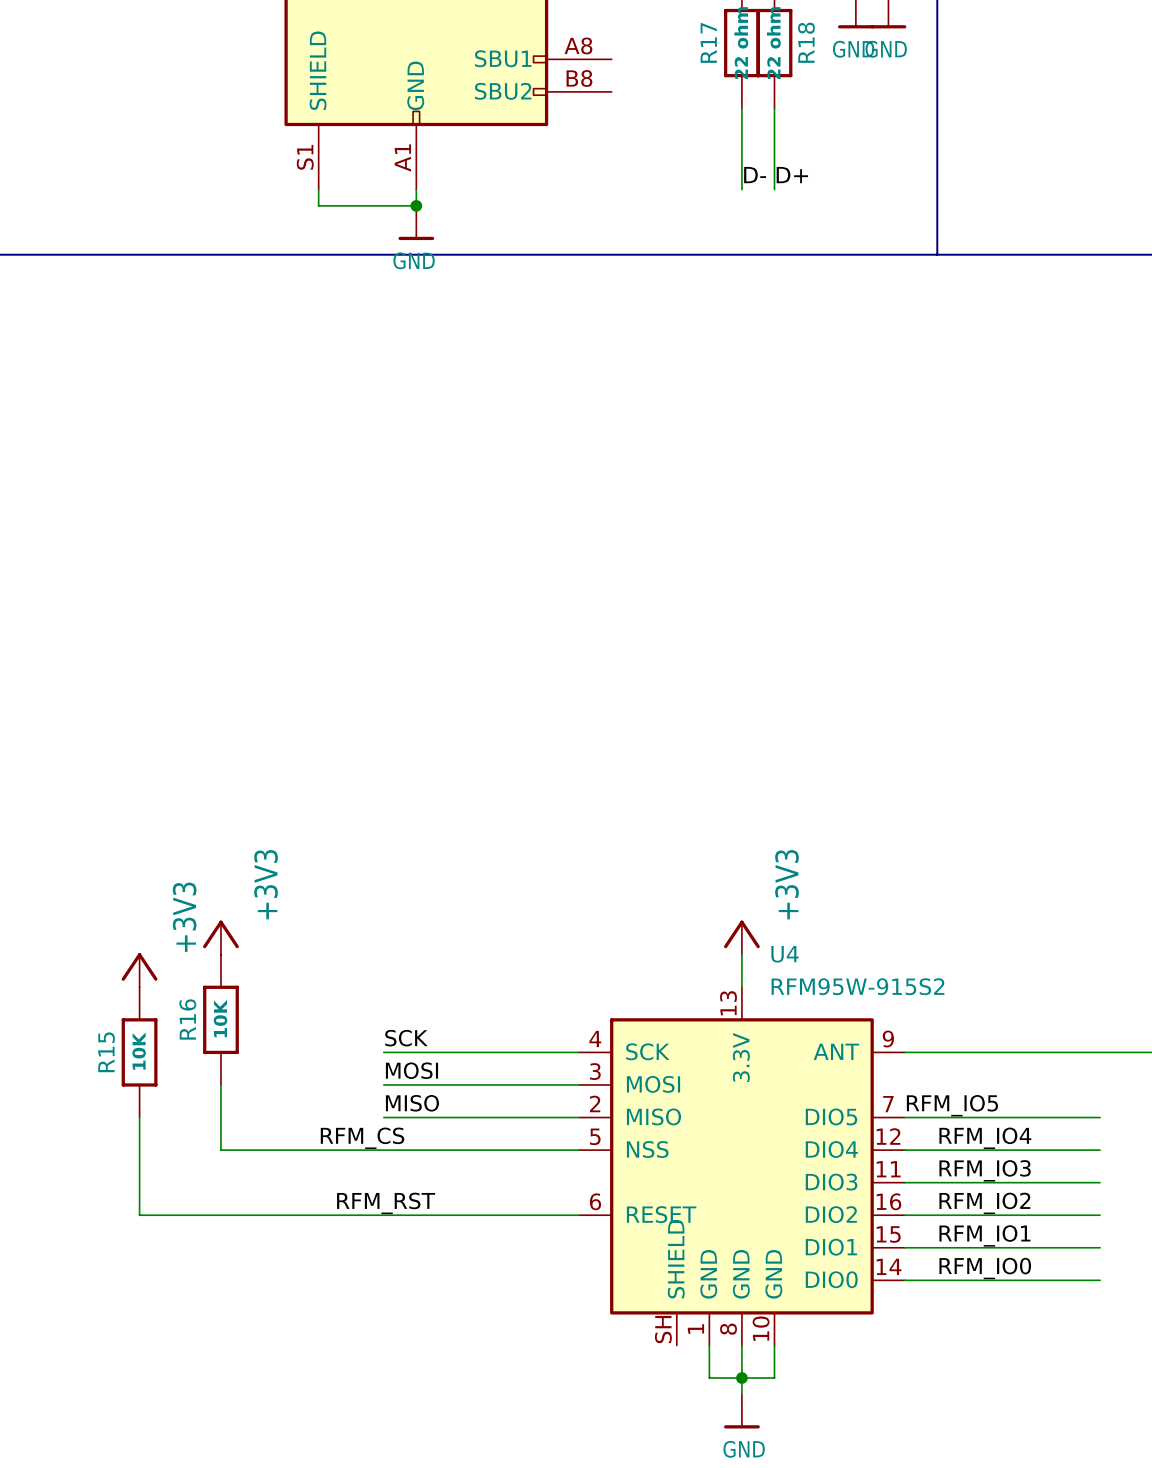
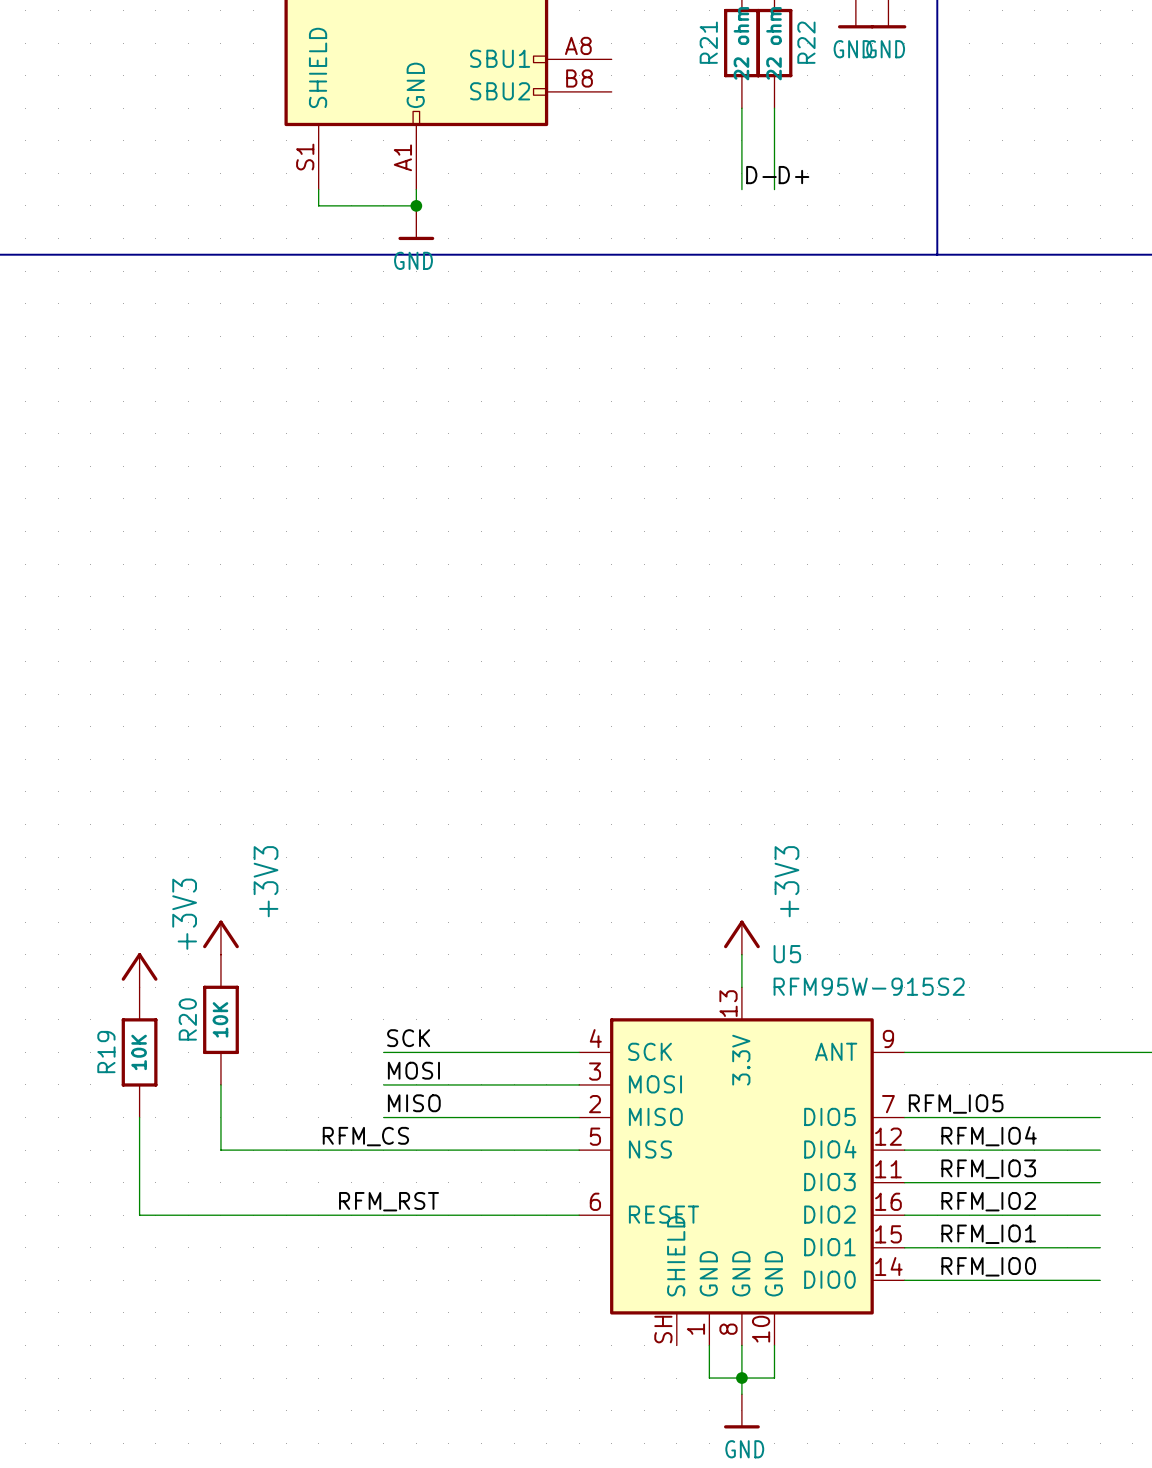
R17 name: R17 (708, 42) -> R21 (708, 42)
R18 name: R18 (806, 42) -> R22 (806, 42)
U4 name: U4 (785, 954) -> U5 (787, 954)
R16 name: R16 (187, 1019) -> R20 (187, 1019)
R15 name: R15 (106, 1052) -> R19 (106, 1052)

